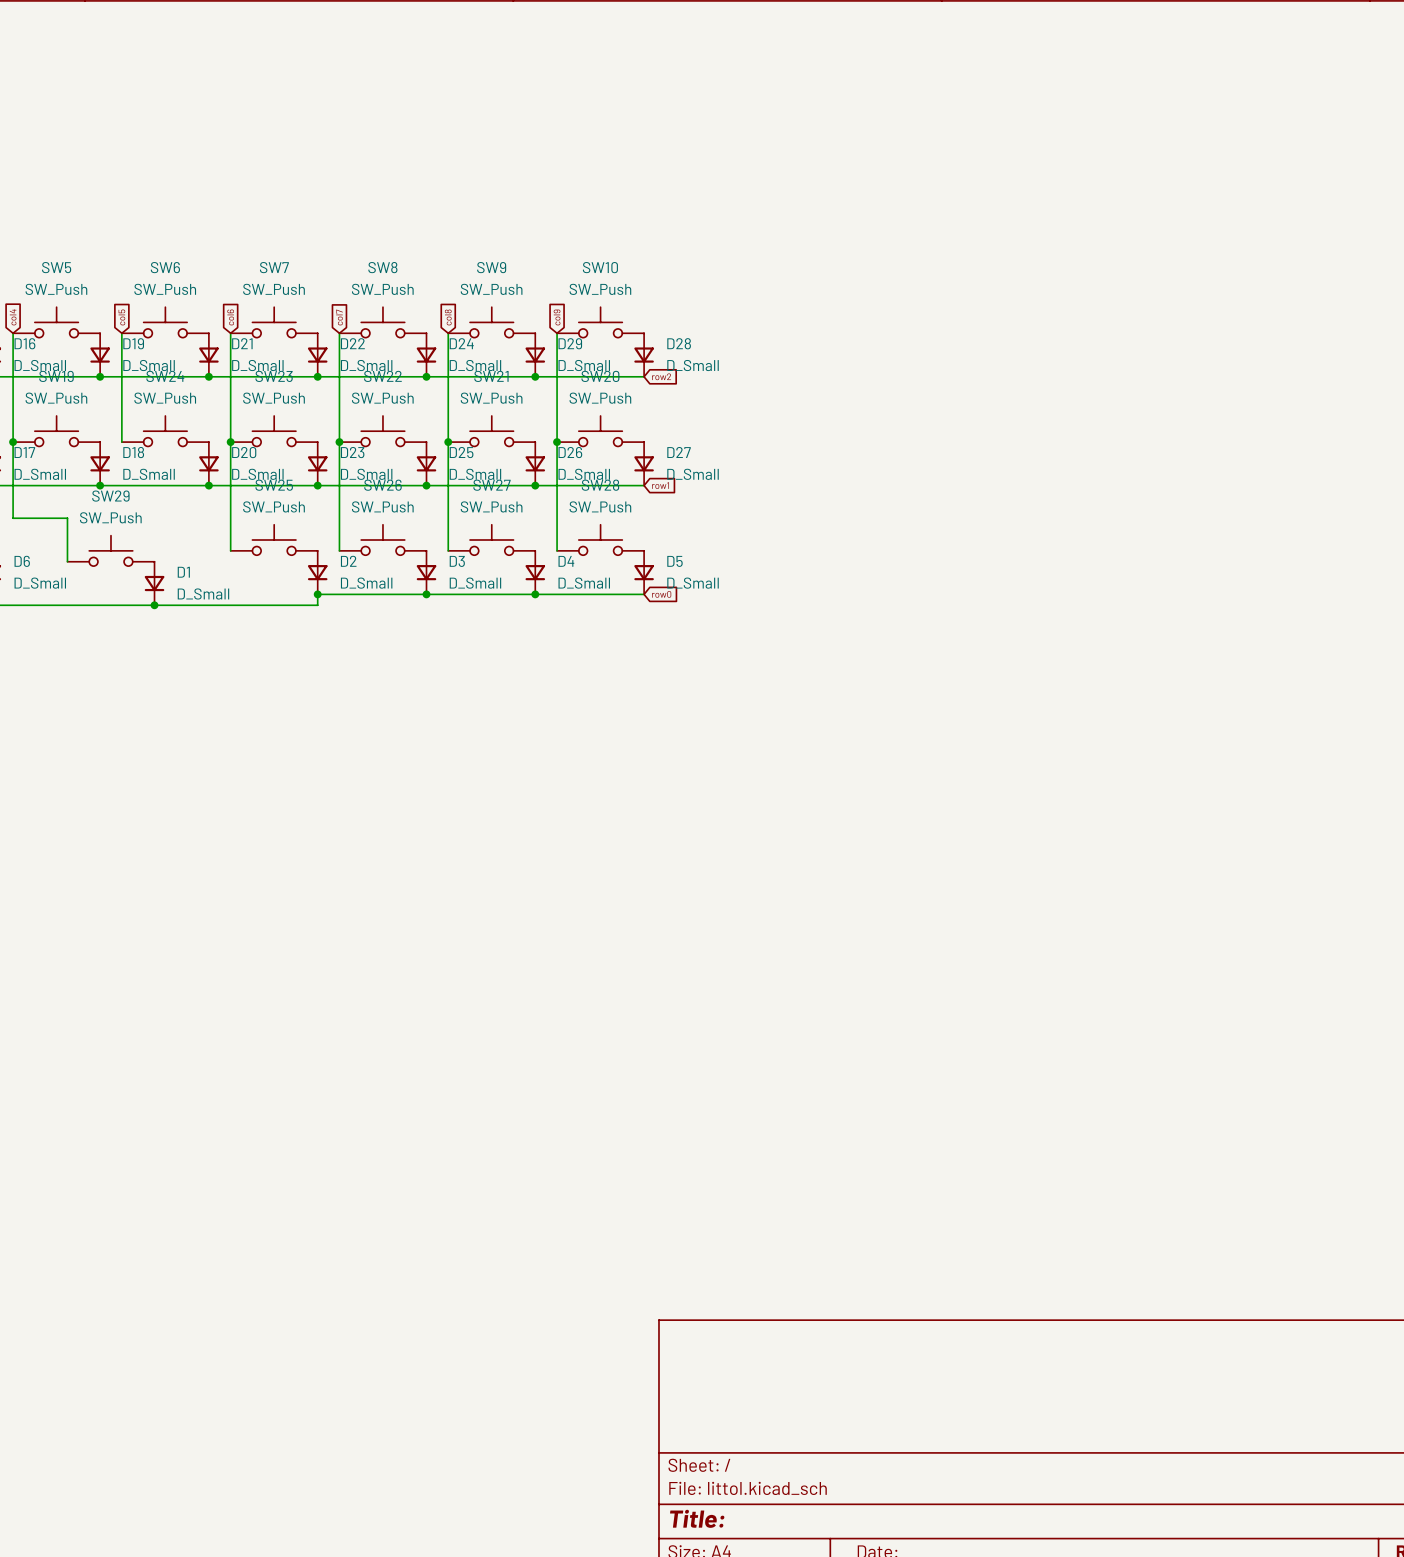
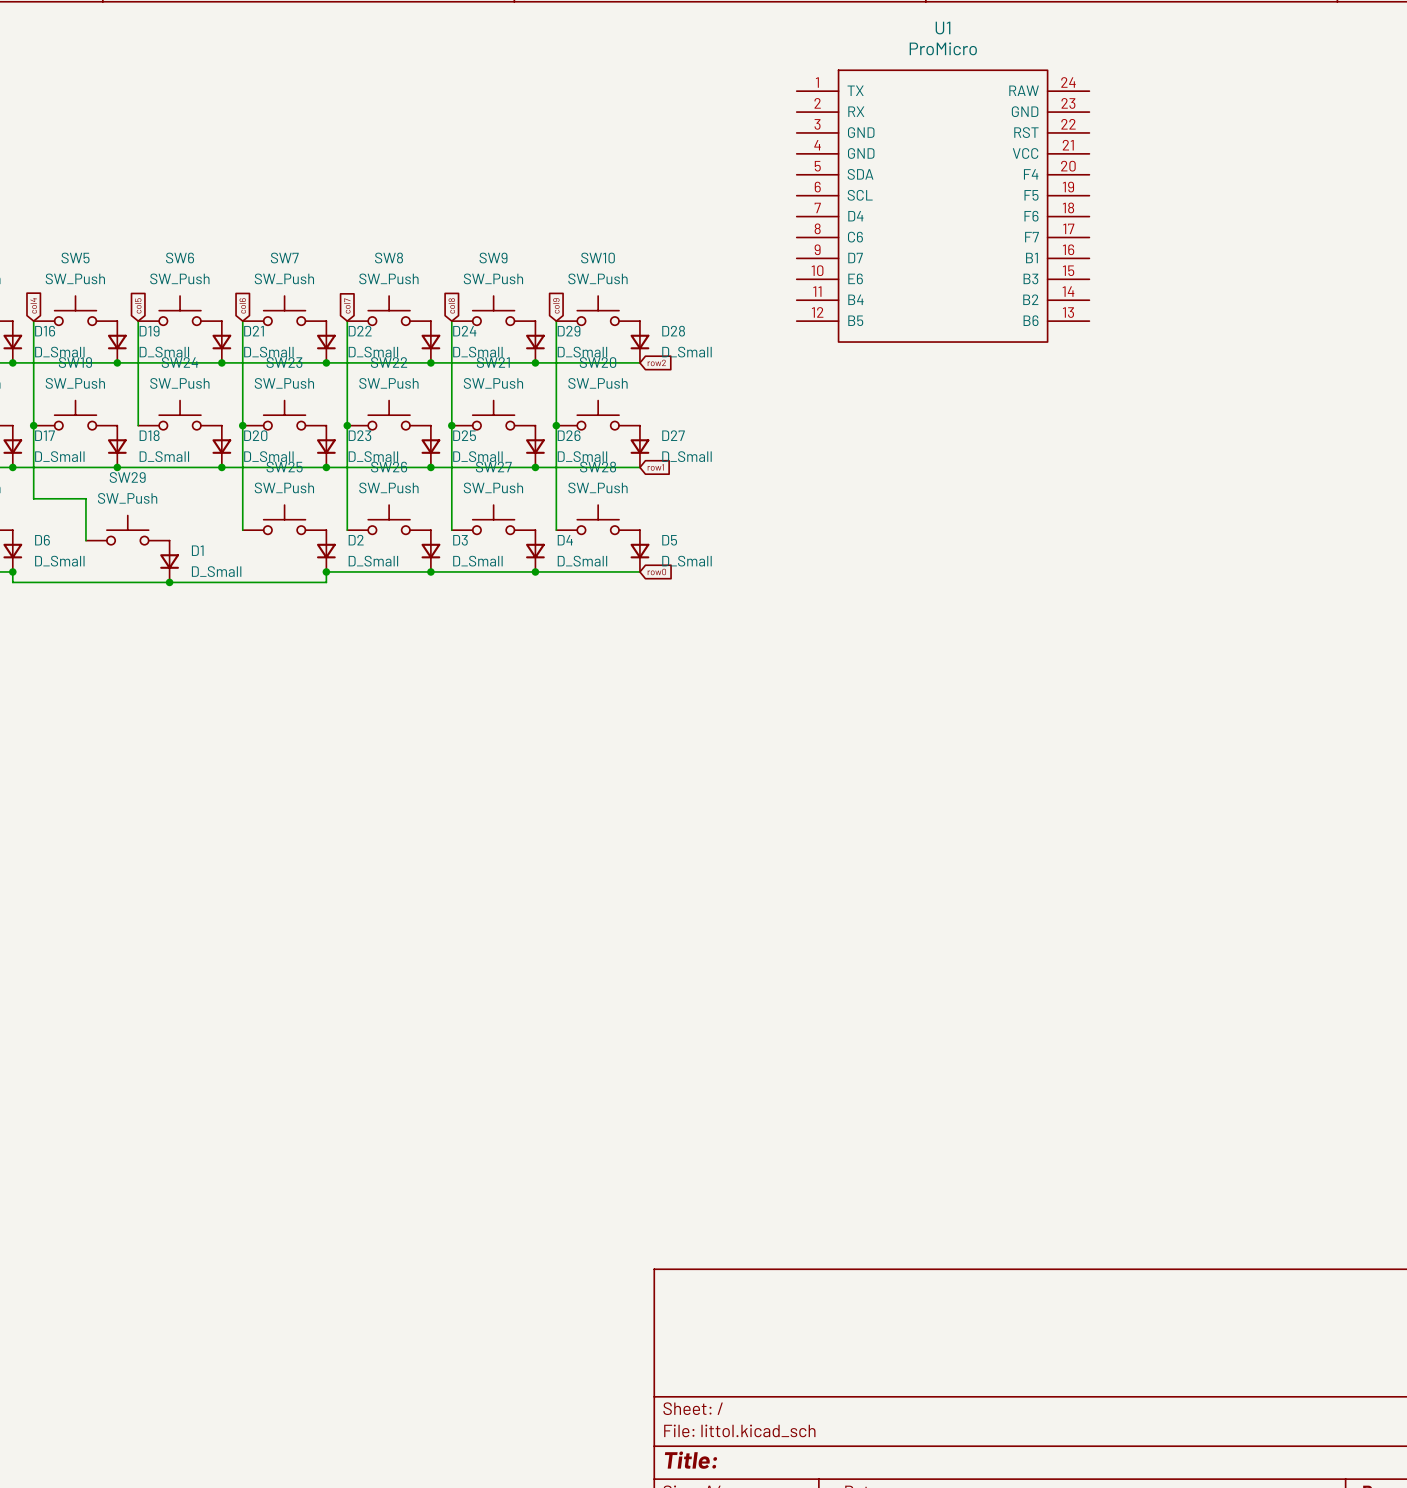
U1: none -> ProMicro (943, 206)

